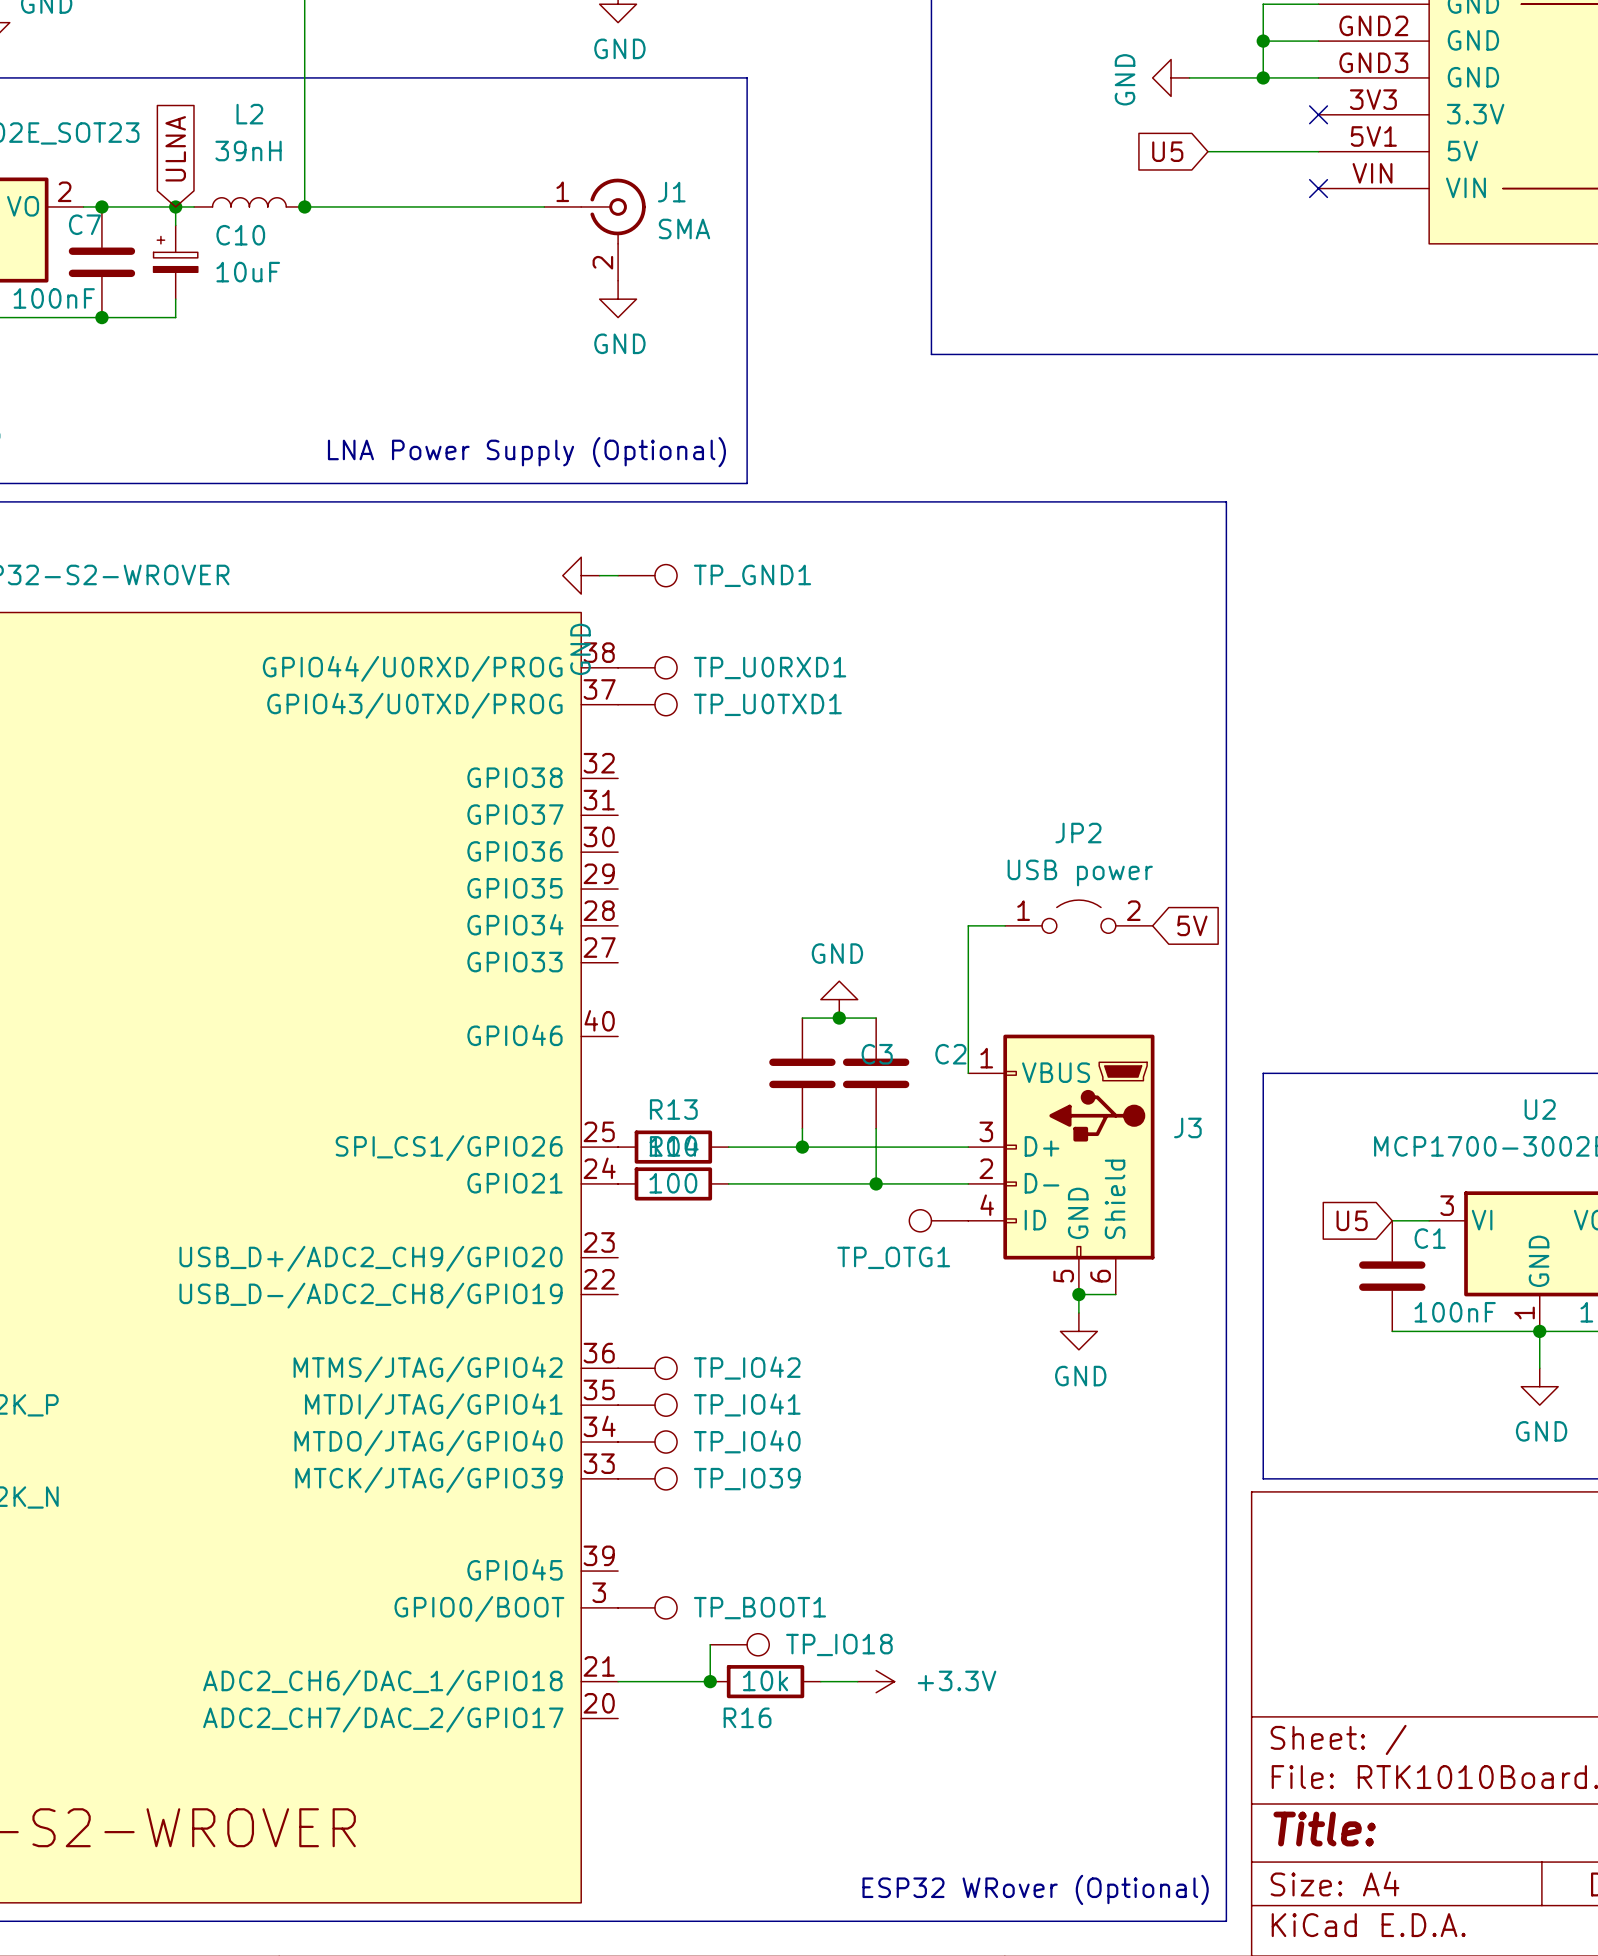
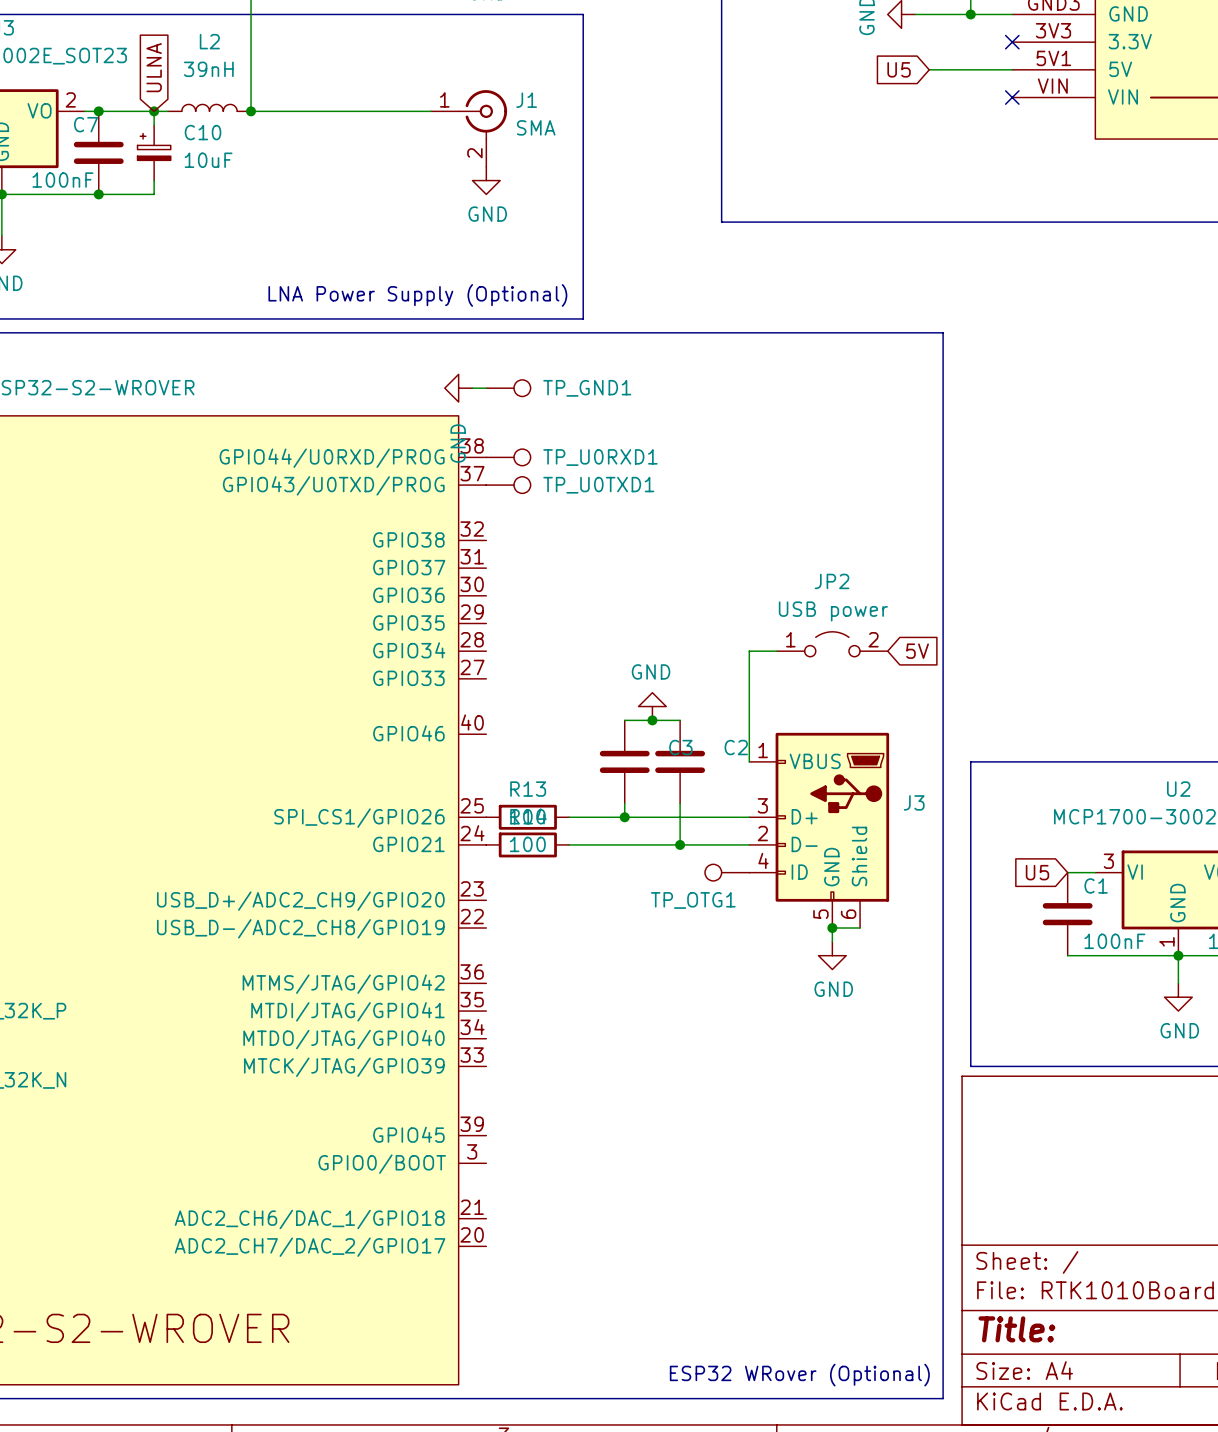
TP_IO42: (647, 1368) -> none
TP_IO41: (647, 1405) -> none
TP_IO40: (647, 1442) -> none
TP_IO39: (647, 1478) -> none
TP_BOOT1: (647, 1607) -> none
wire: (710, 1644) (710, 1681) (618, 1681) -> none
TP_IO18: (739, 1644) -> none
junction: (710, 1681) -> none
R16: 10k (765, 1681) -> none
wire: (820, 1681) (857, 1681) -> none
power symbol: +3.3V (876, 1681) -> none

